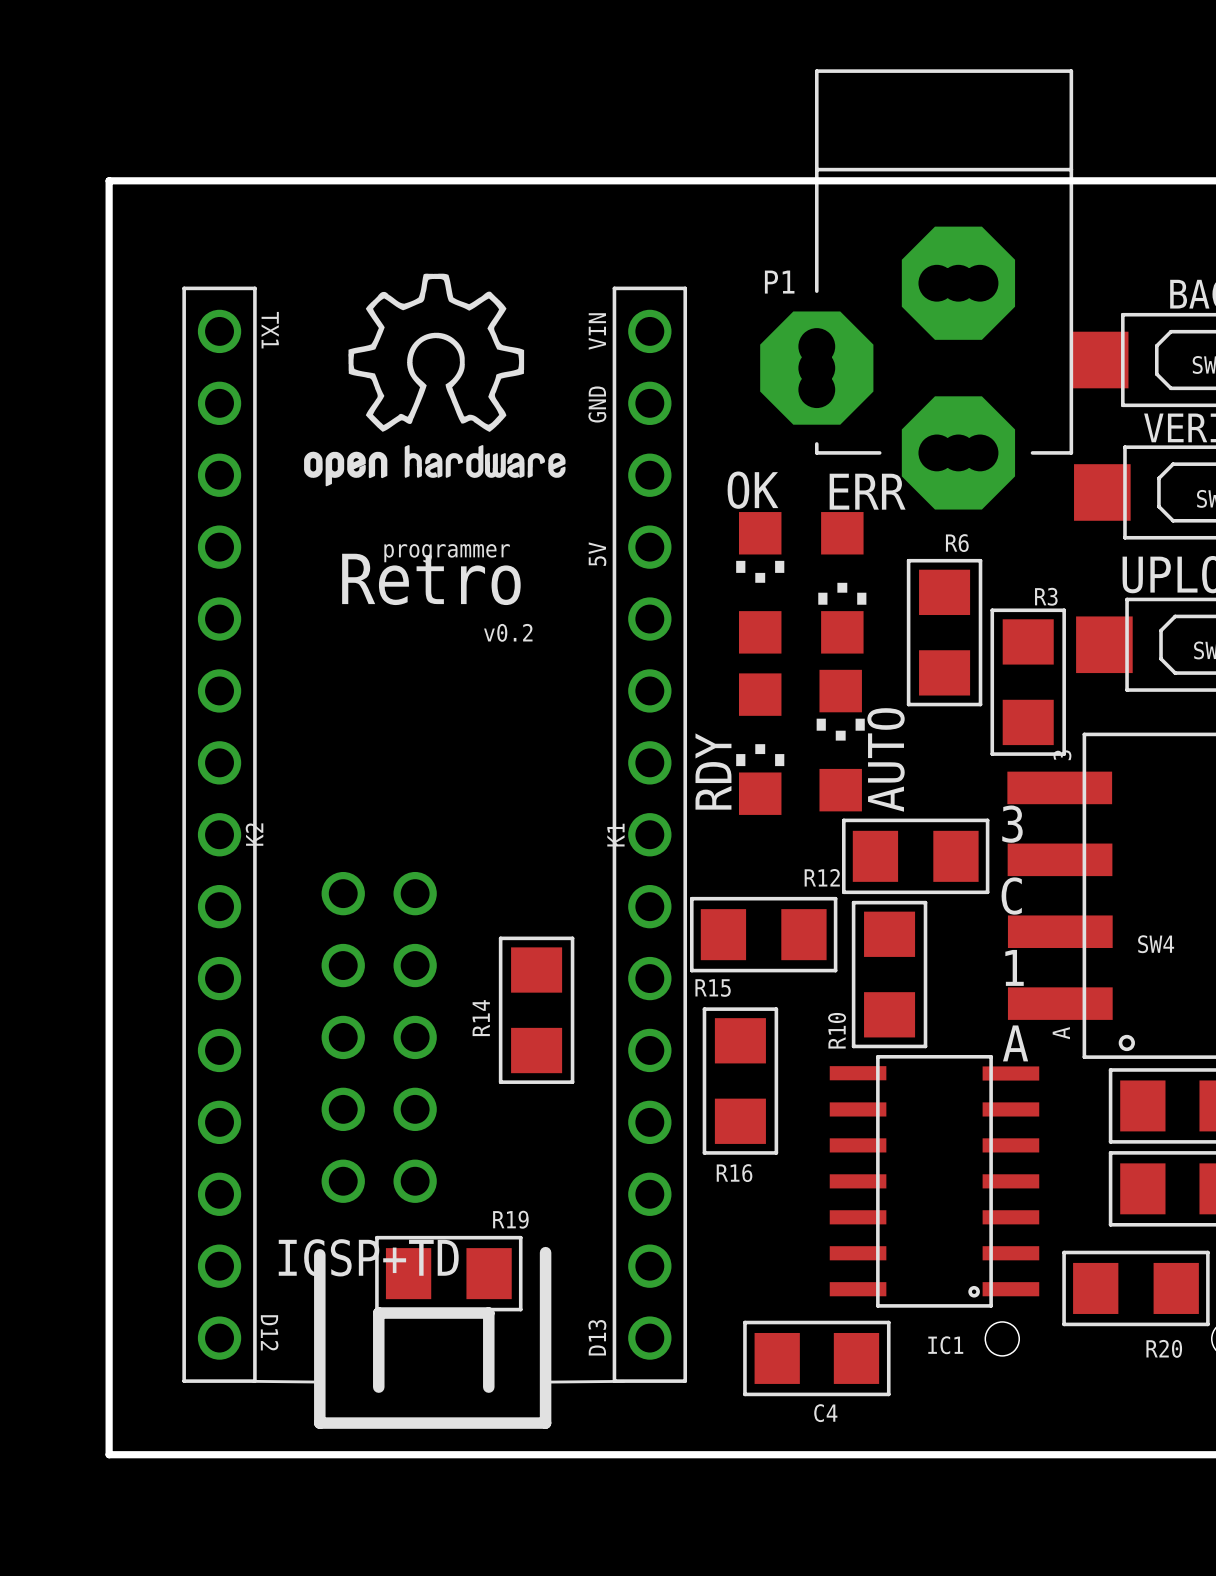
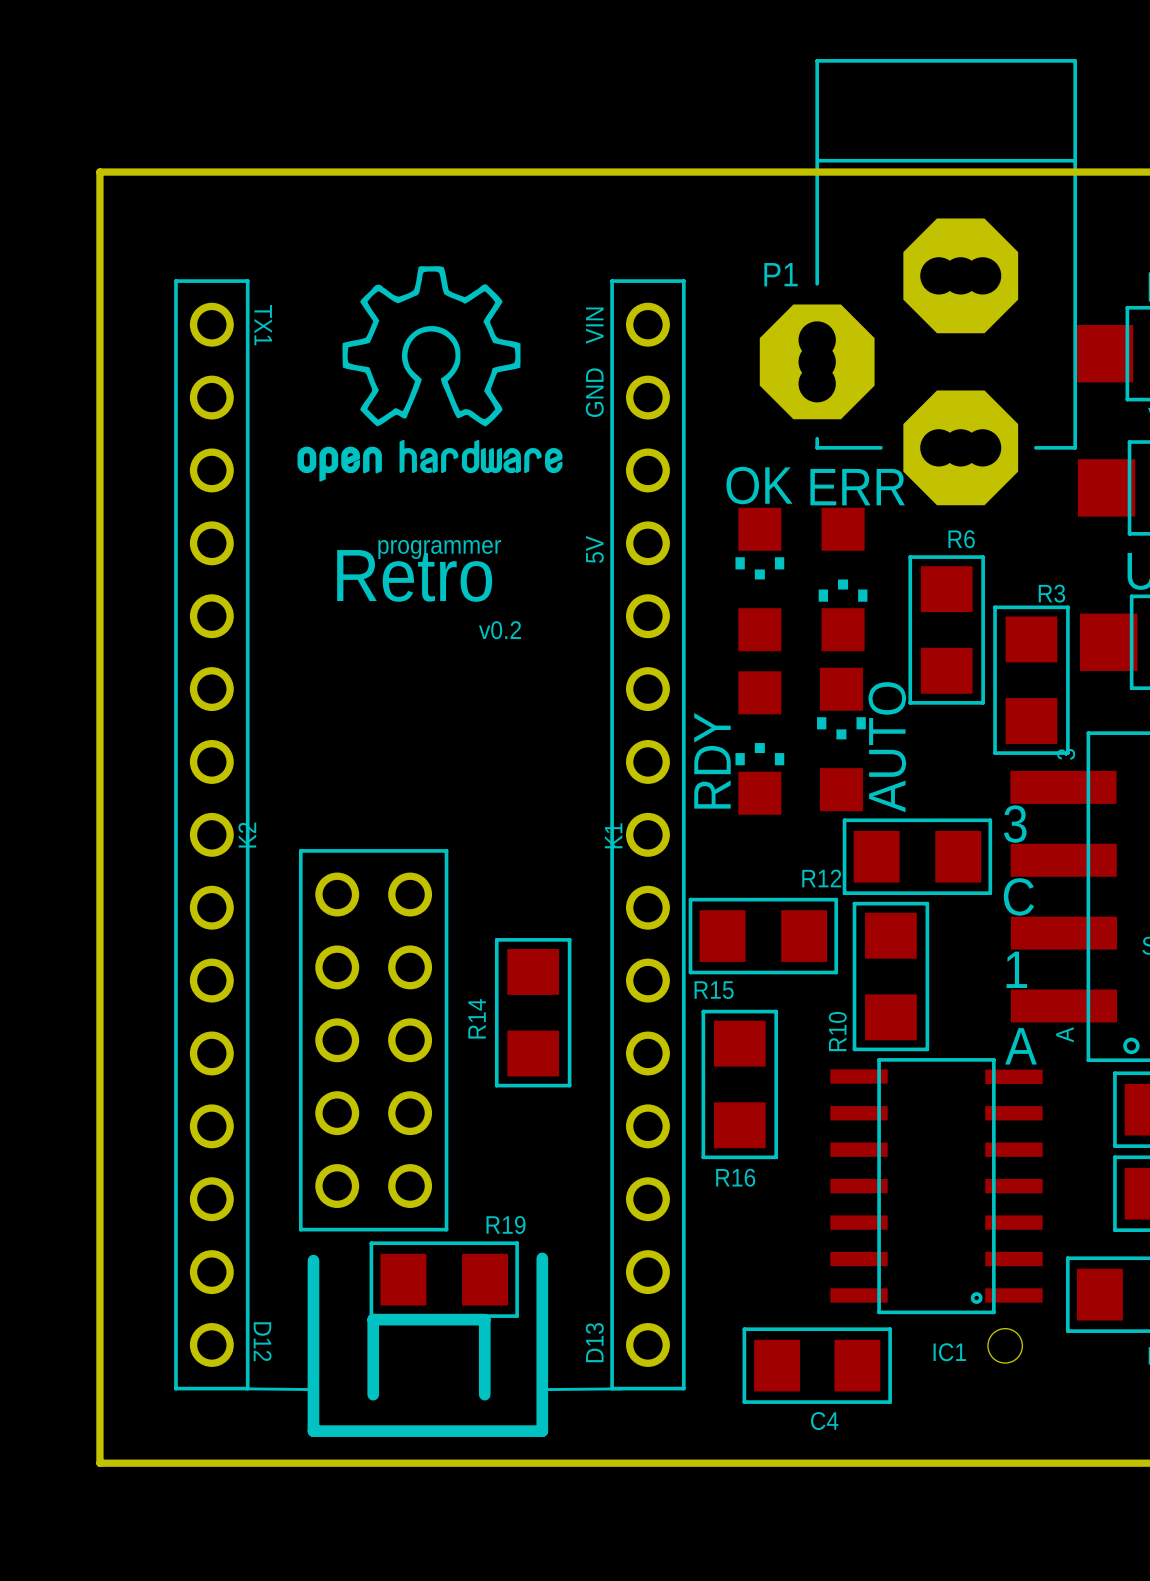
ICSP+TD side: bottom (379, 1037) -> top (373, 1040)

